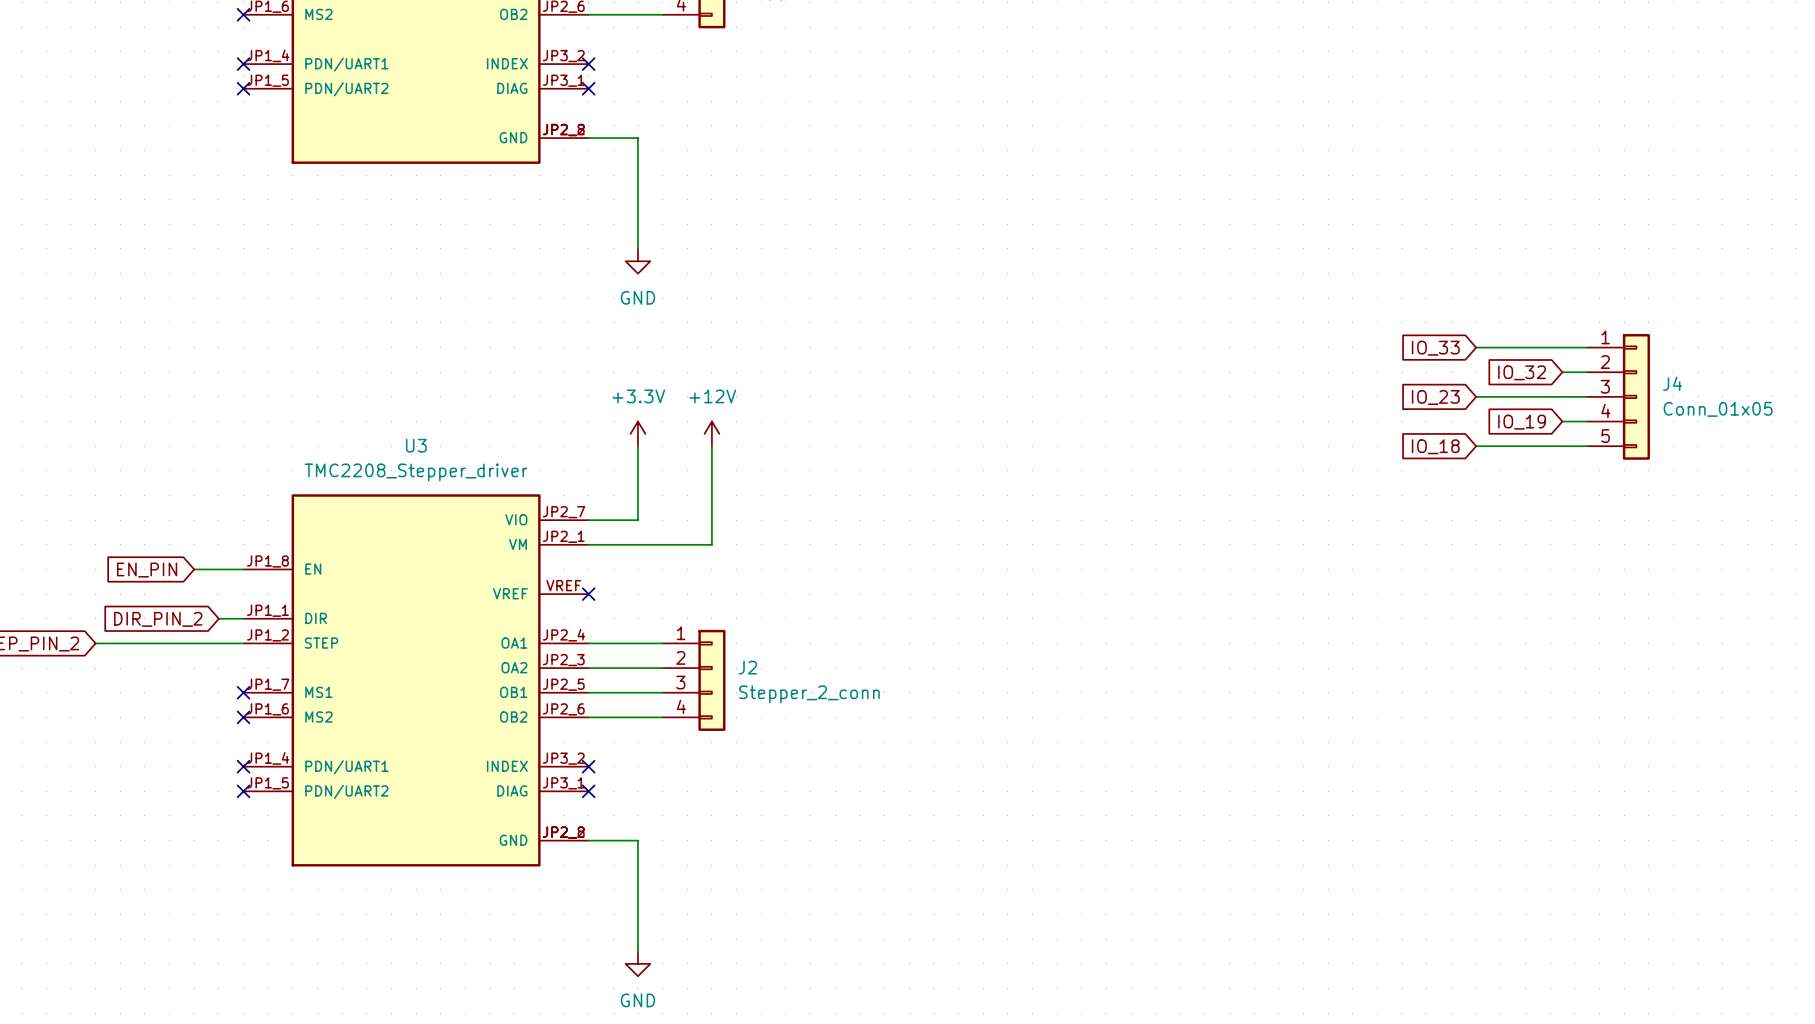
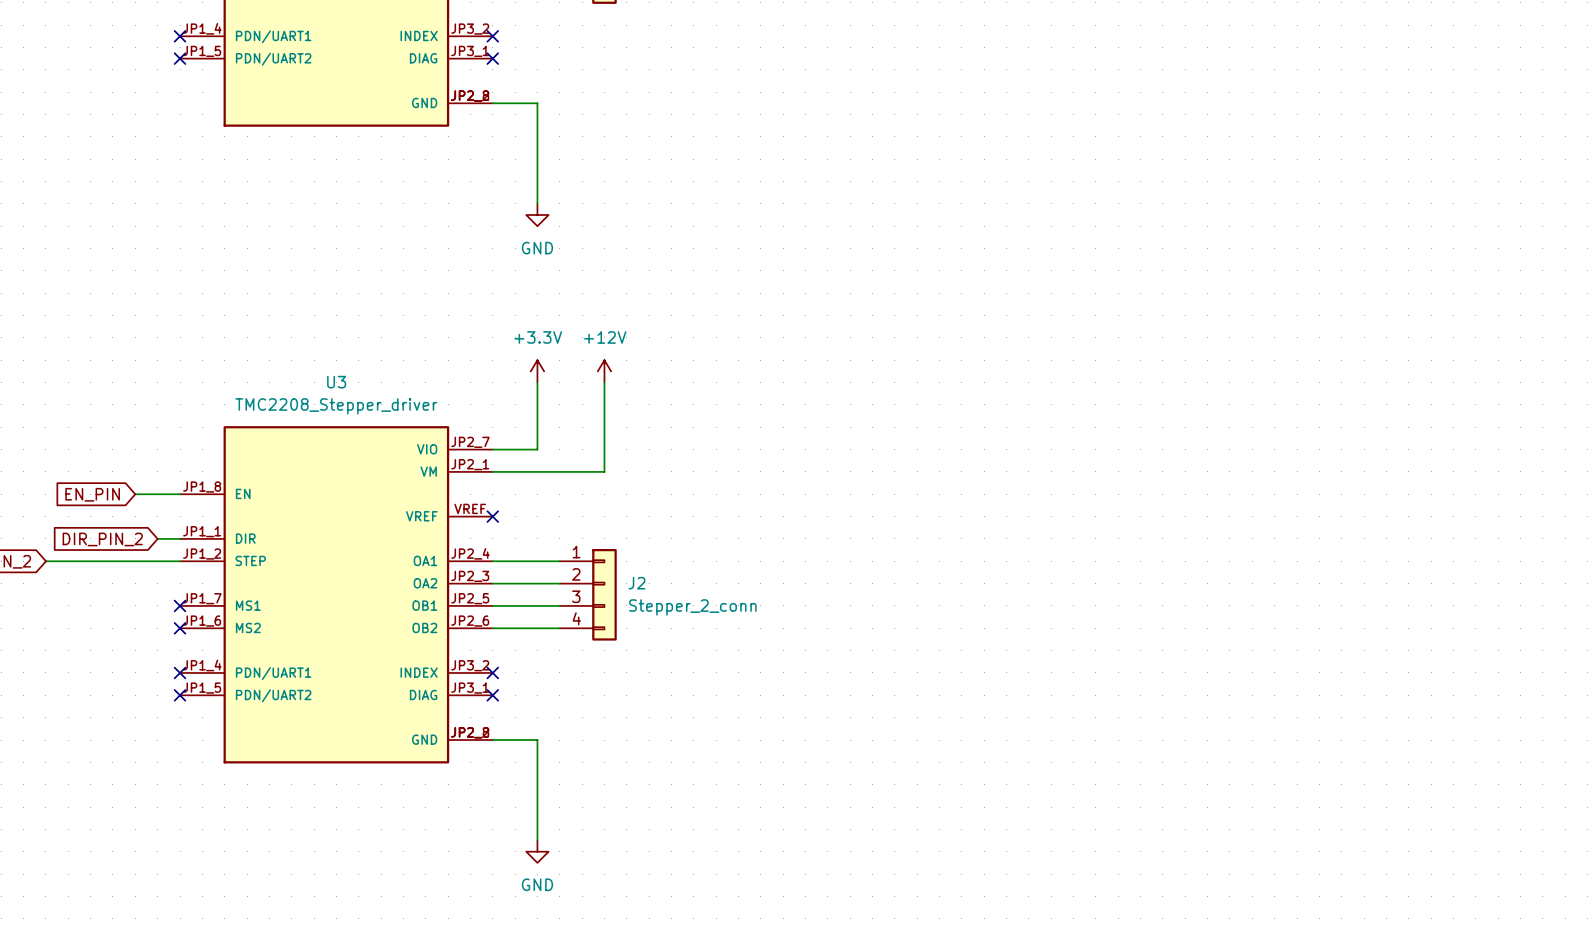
wire: (1476, 347) (1587, 347) -> none
global label: IO_33 (1435, 348) -> none
global label: IO_32 (1522, 372) -> none
wire: (1562, 372) (1587, 372) -> none
wire: (1476, 396) (1587, 396) -> none
J4: Conn_01x05 (1618, 396) -> none
global label: IO_23 (1435, 397) -> none
wire: (1562, 421) (1587, 421) -> none
global label: IO_19 (1522, 422) -> none
global label: IO_18 (1435, 446) -> none
wire: (1476, 446) (1587, 446) -> none

